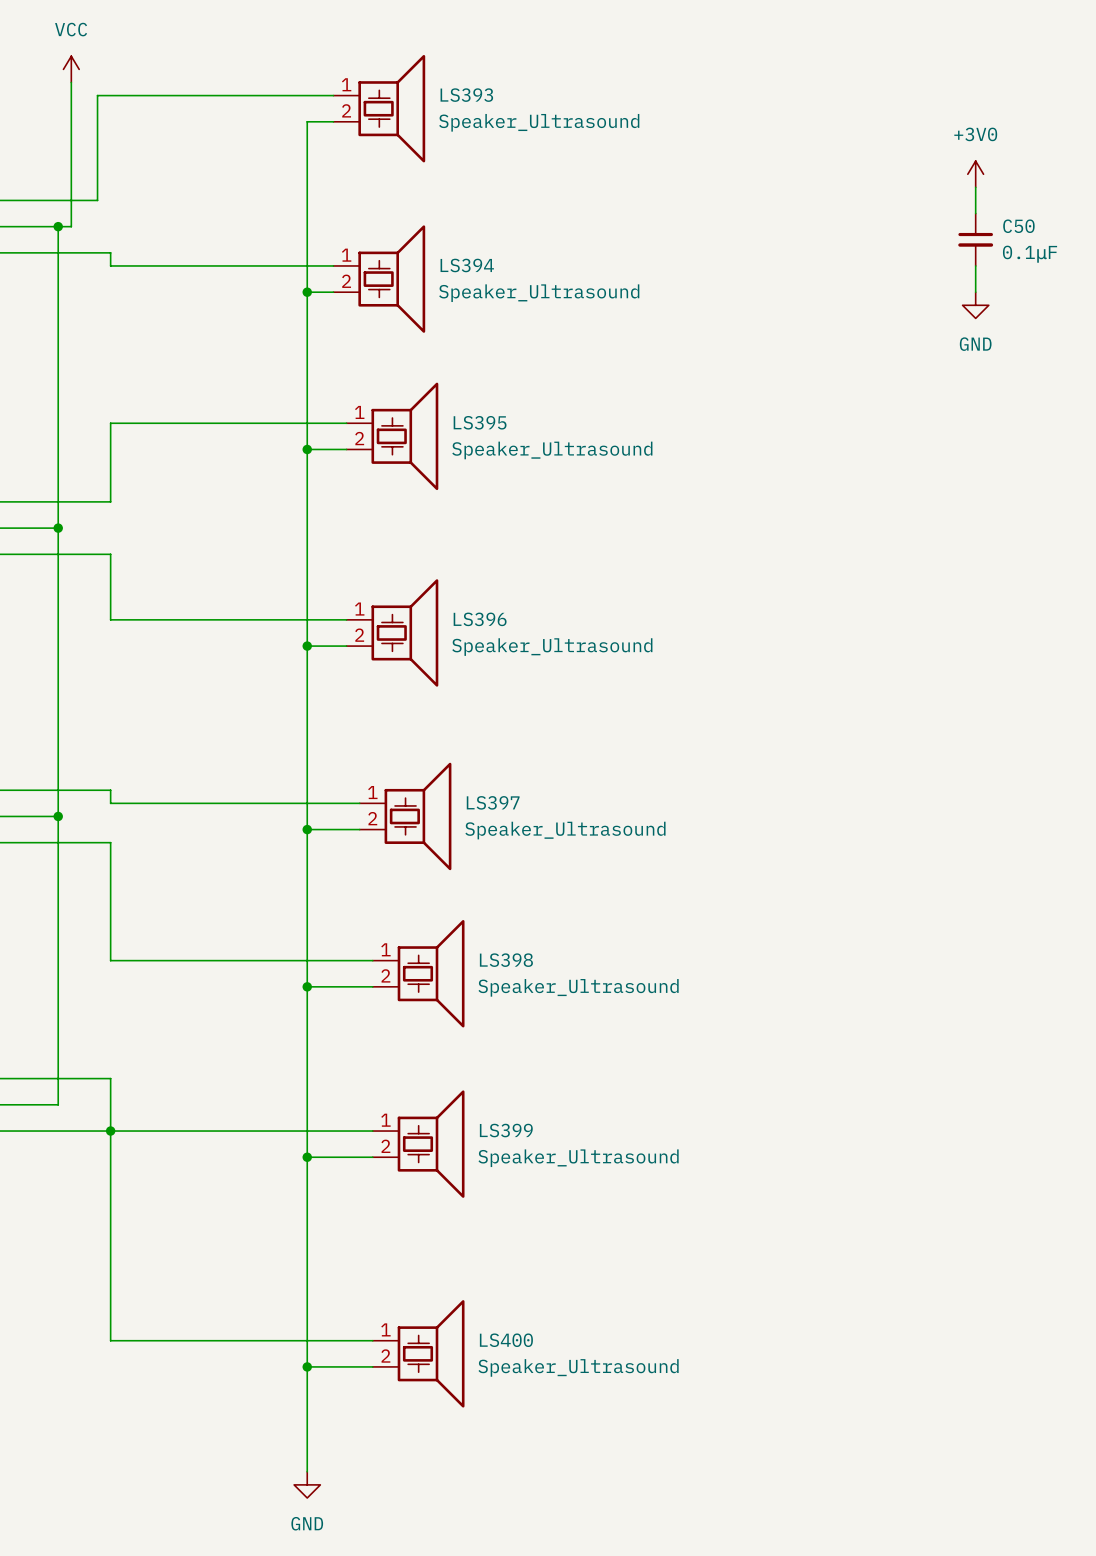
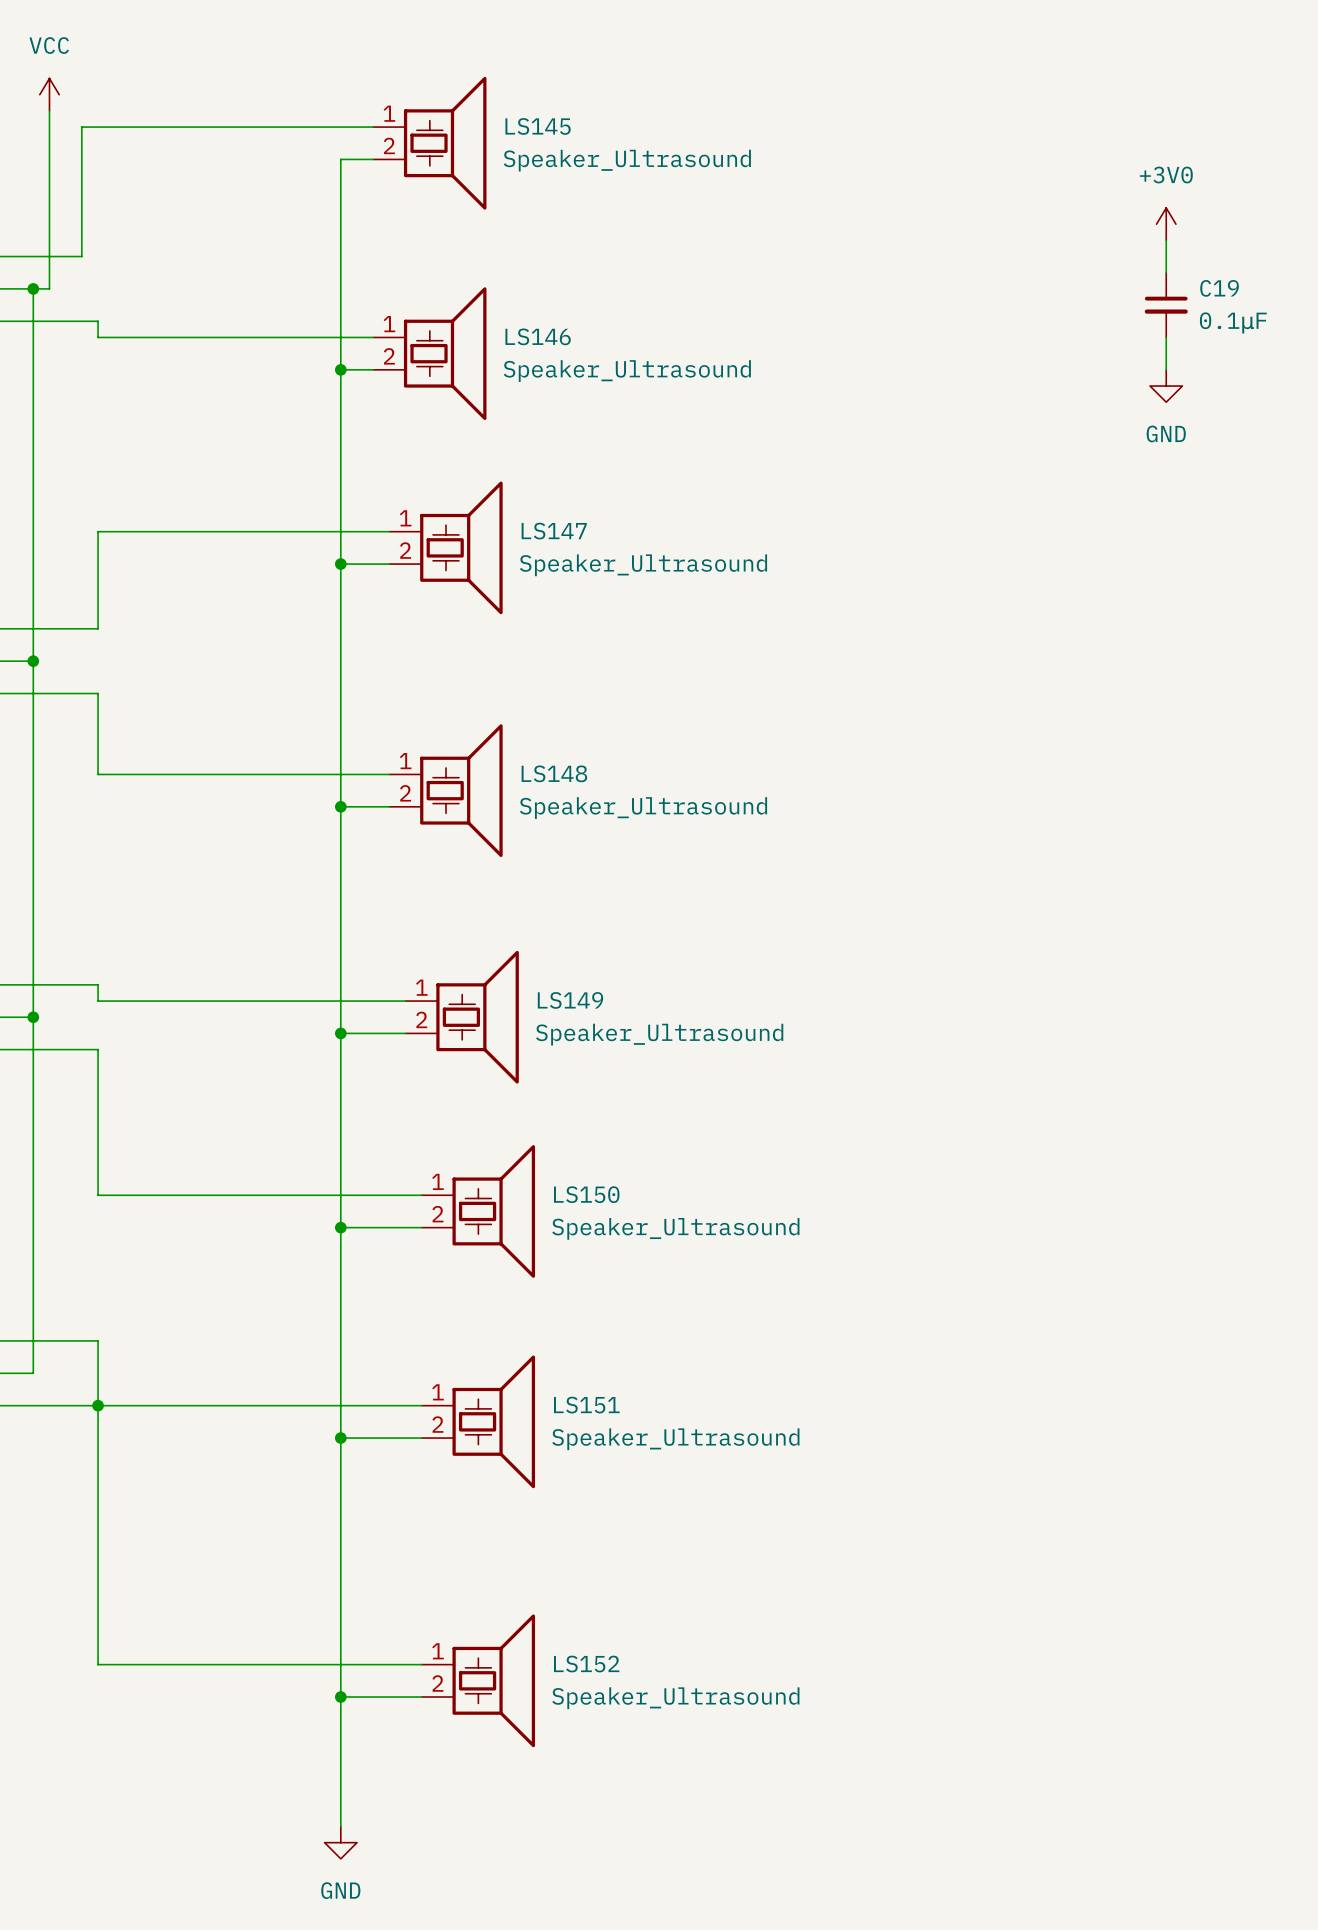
LS393 name: LS393 (466, 95) -> LS145 (538, 126)
C50 name: C50 (1018, 226) -> C19 (1219, 288)
LS394 name: LS394 (467, 265) -> LS146 (538, 336)
LS395 name: LS395 (480, 422) -> LS147 (554, 531)
LS396 name: LS396 (480, 619) -> LS148 (554, 773)
LS397 name: LS397 (493, 802) -> LS149 (570, 1000)
LS398 name: LS398 (506, 960) -> LS150 (586, 1194)
LS399 name: LS399 (506, 1130) -> LS151 (586, 1405)
LS400 name: LS400 (506, 1340) -> LS152 (586, 1664)

